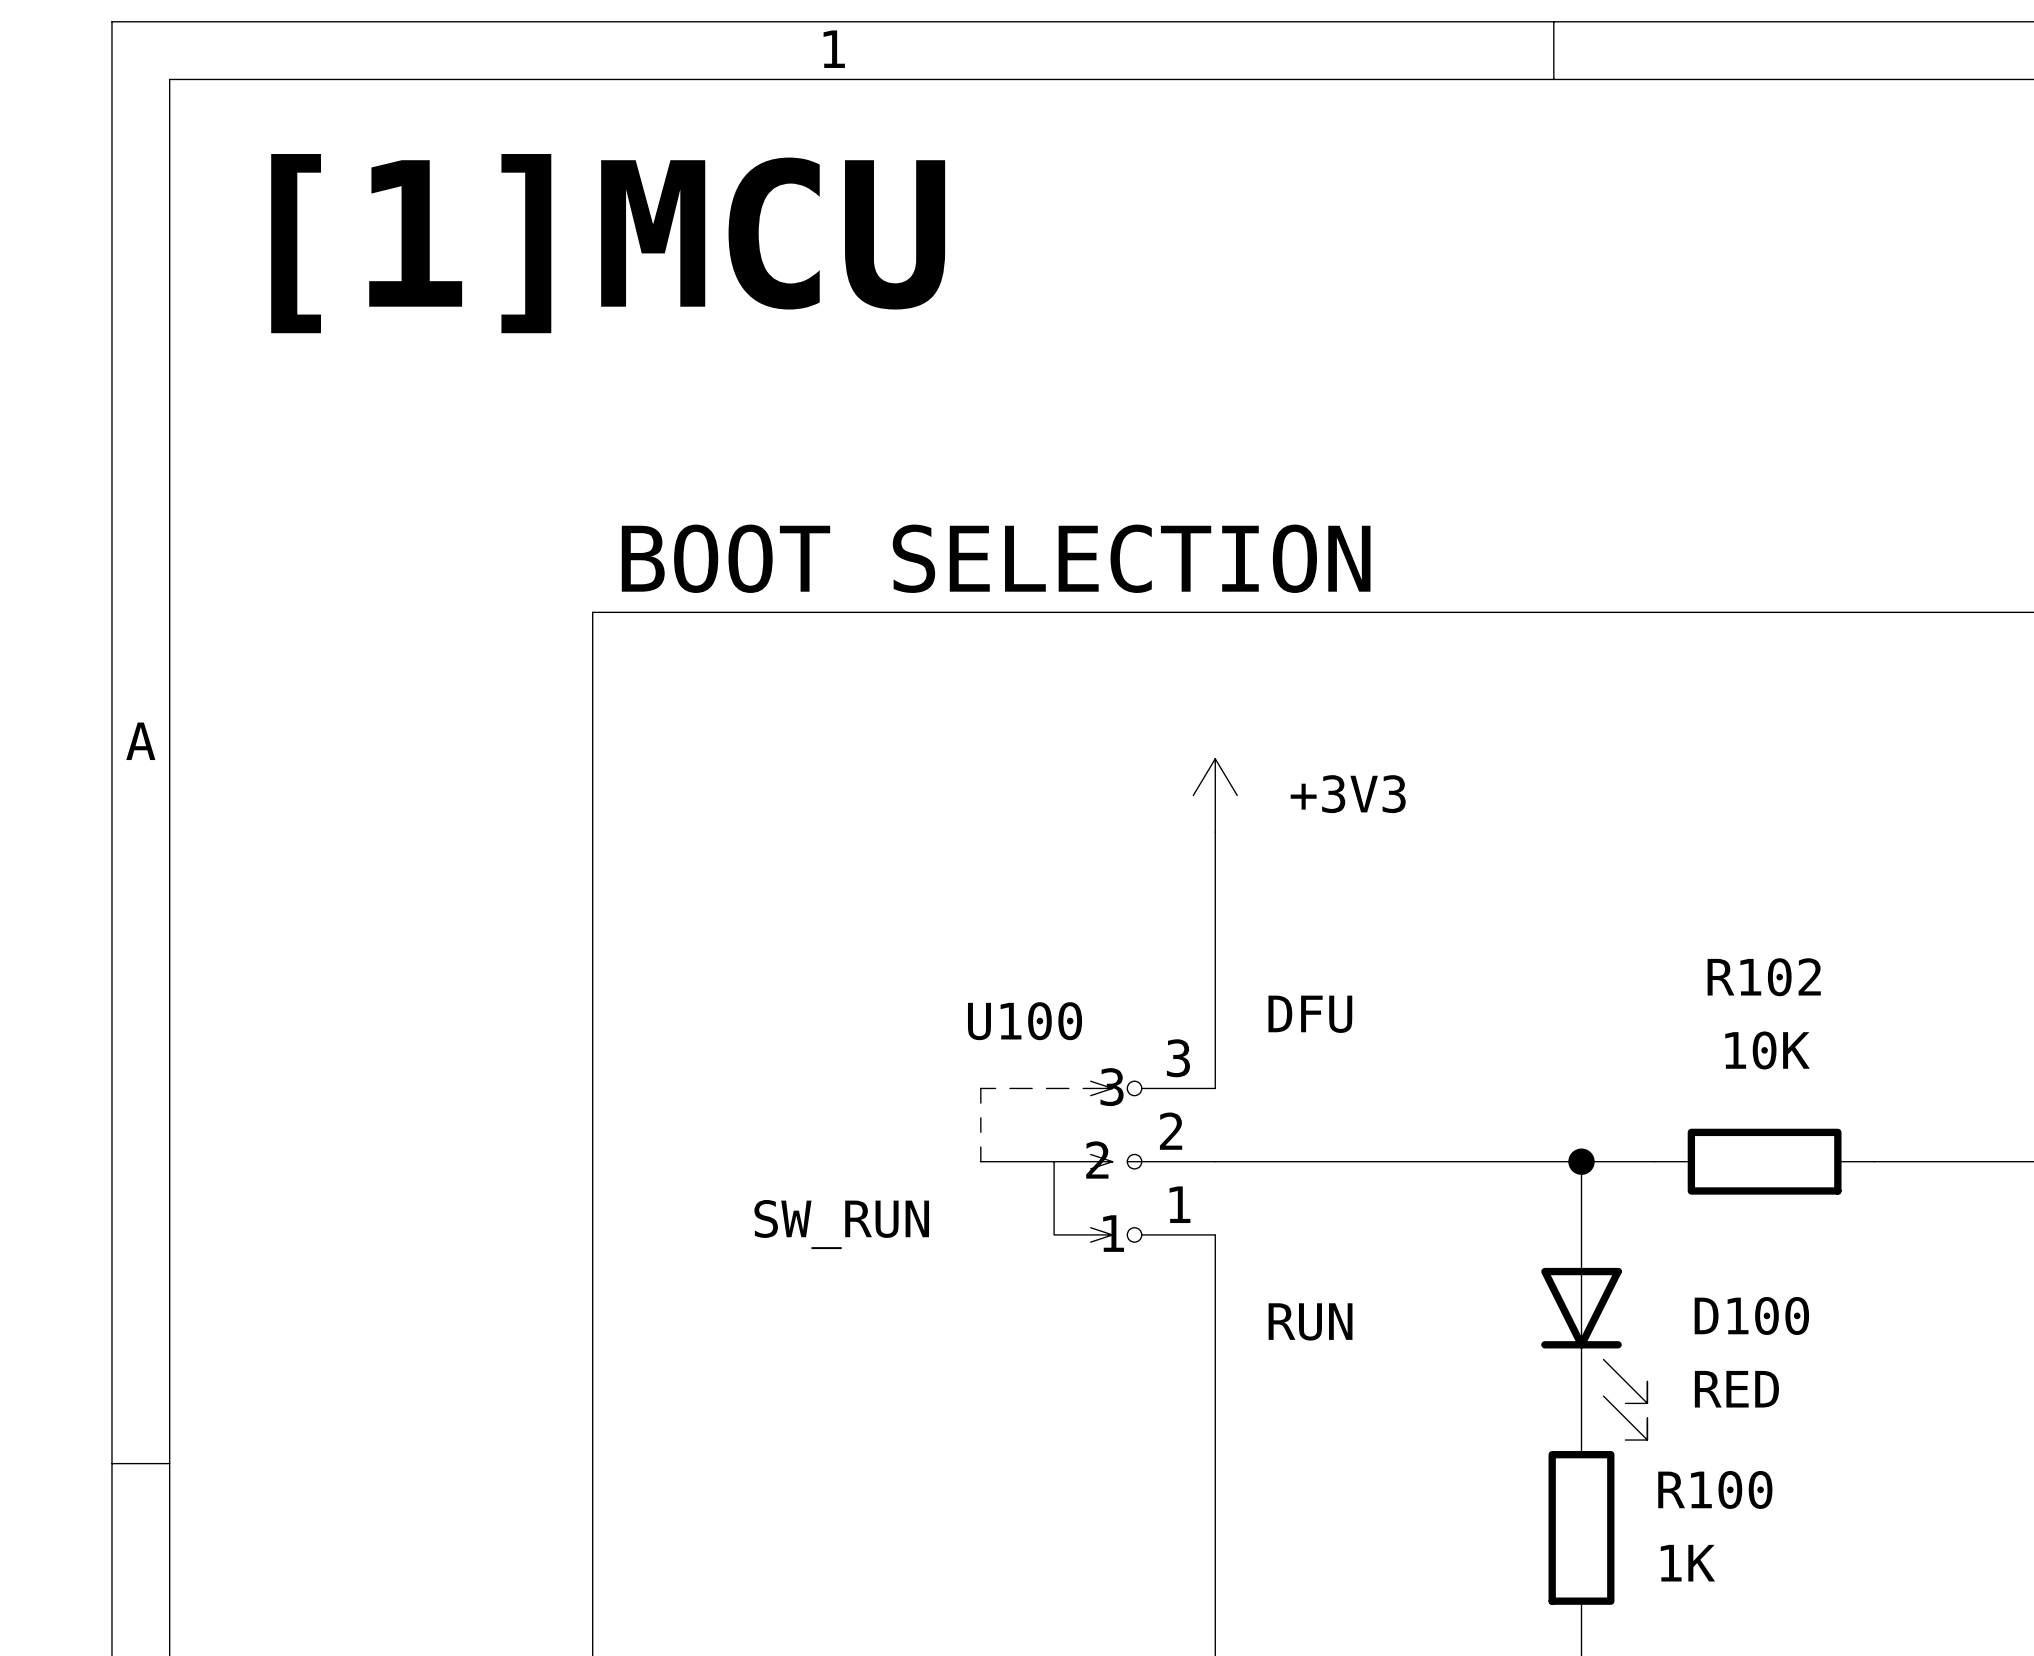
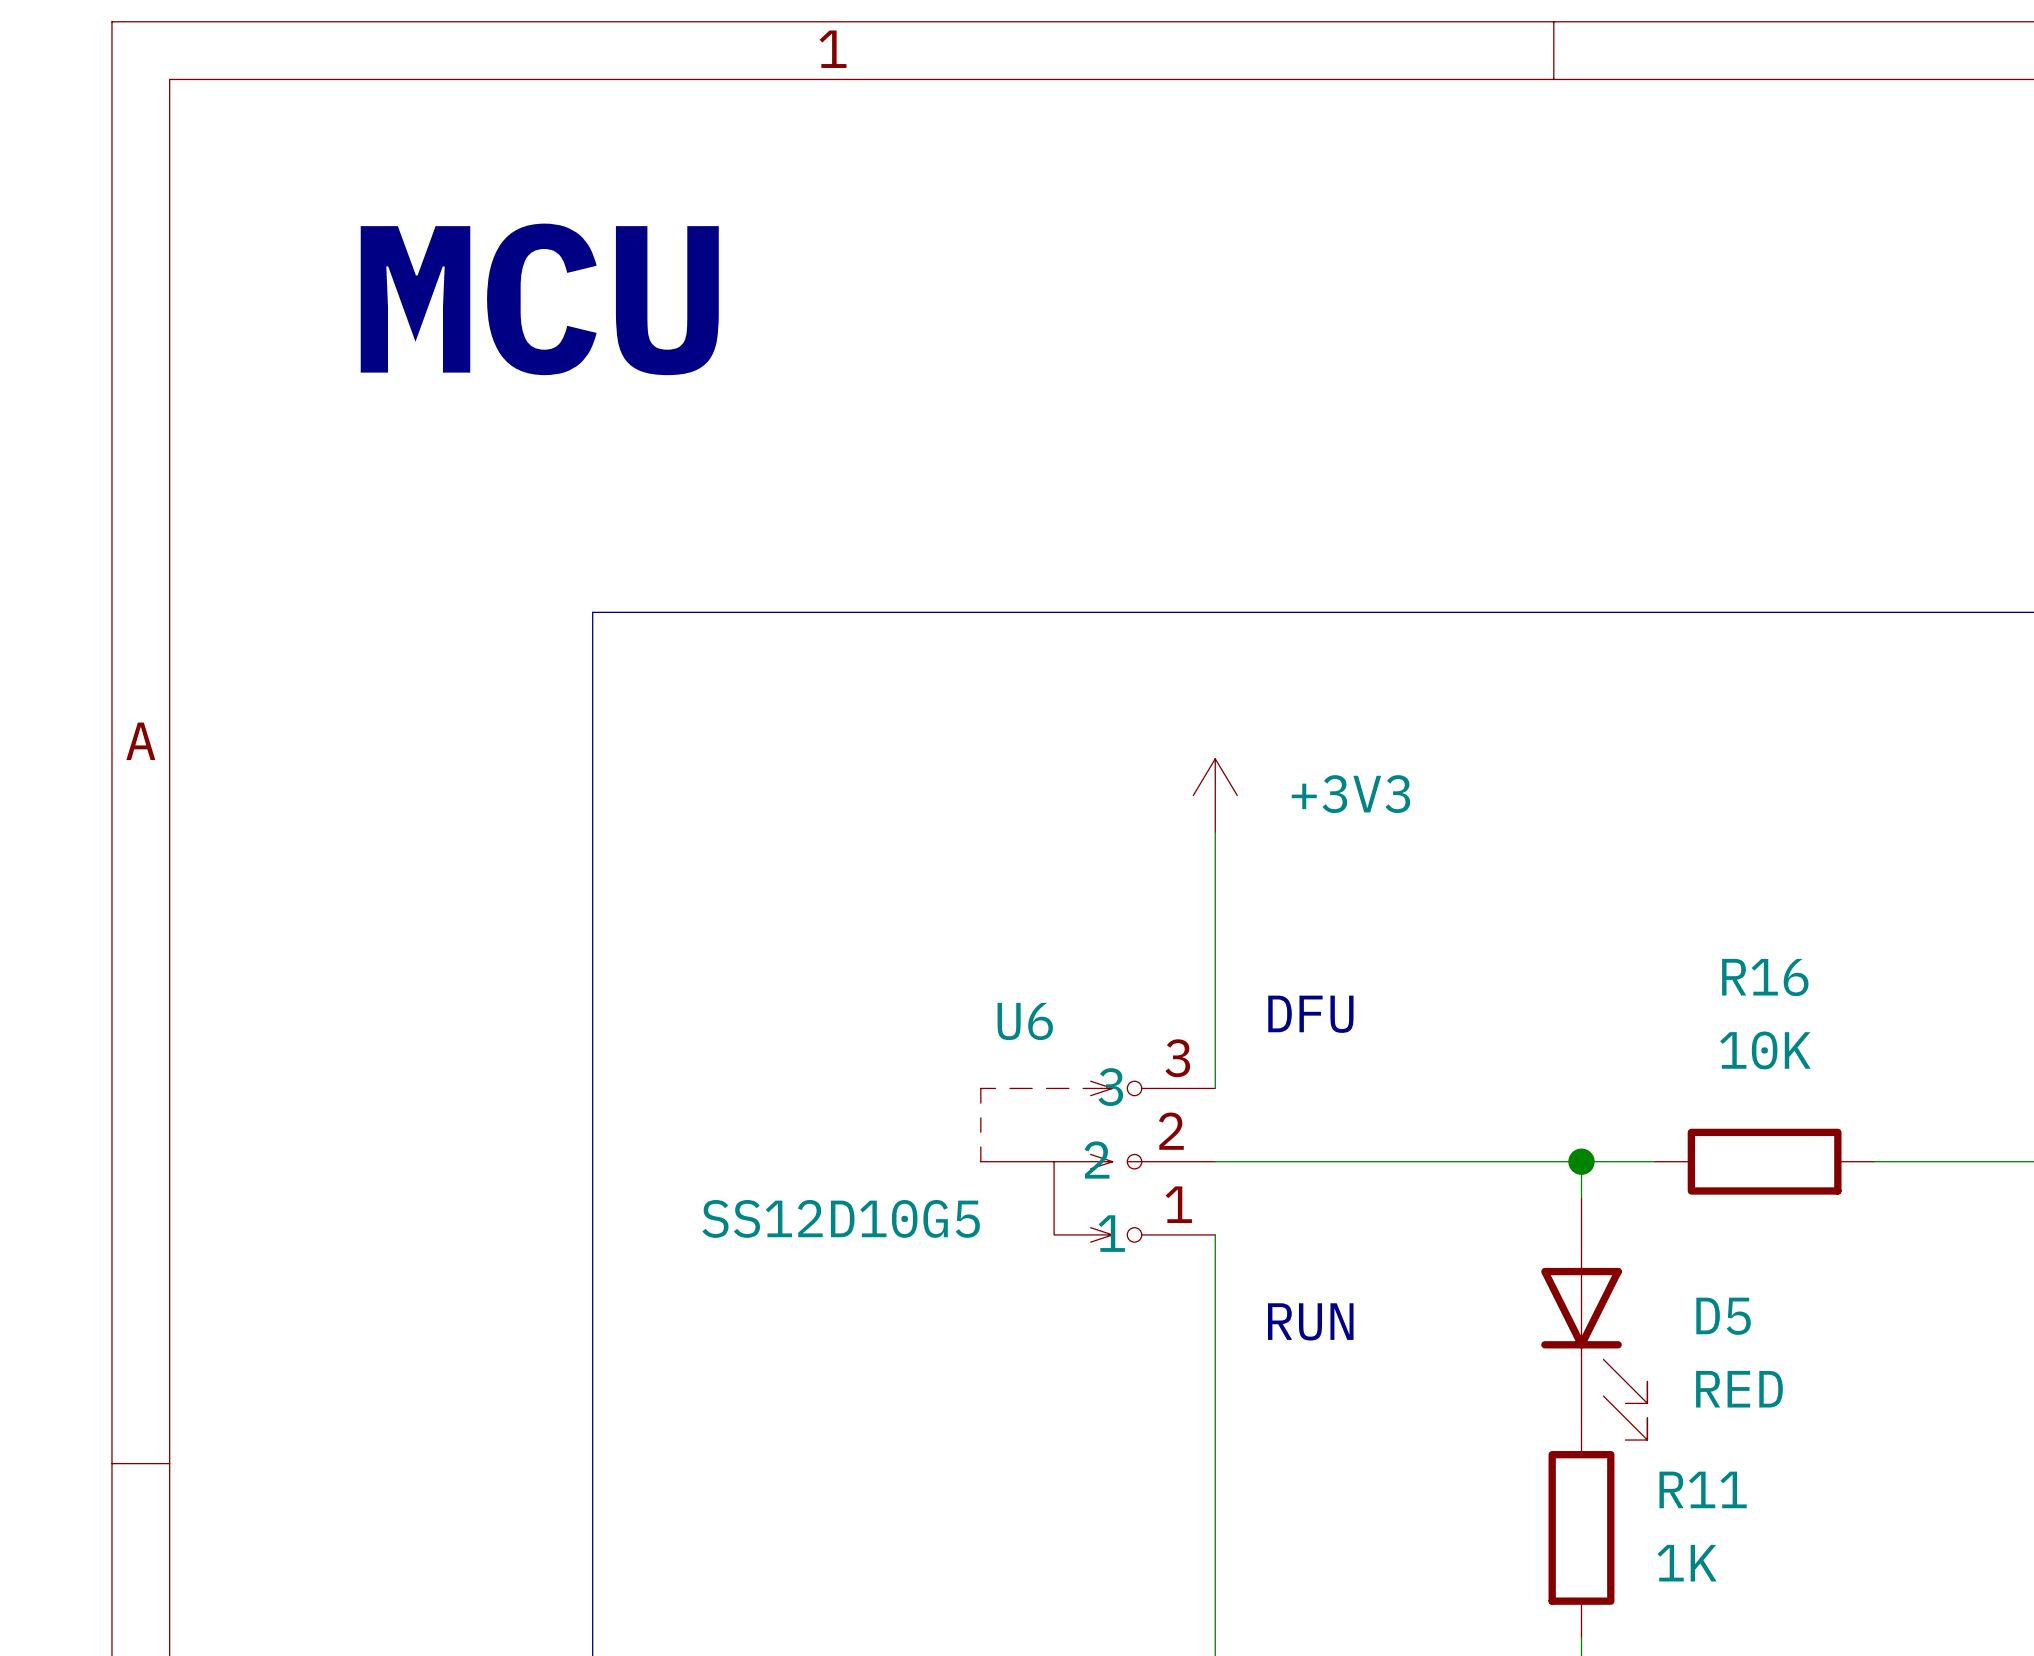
text: [1]MCU (608, 243) -> MCU (539, 299)
text: BOOT SELECTION (996, 558) -> none
R102 name: R102 (1764, 977) -> R16 (1765, 977)
U100 name: U100 (1025, 1021) -> U6 (1025, 1021)
U100 value: SW_RUN (841, 1224) -> SS12D10G5 (841, 1218)
D100 name: D100 (1751, 1315) -> D5 (1723, 1316)
R100 name: R100 (1715, 1489) -> R11 (1703, 1489)

